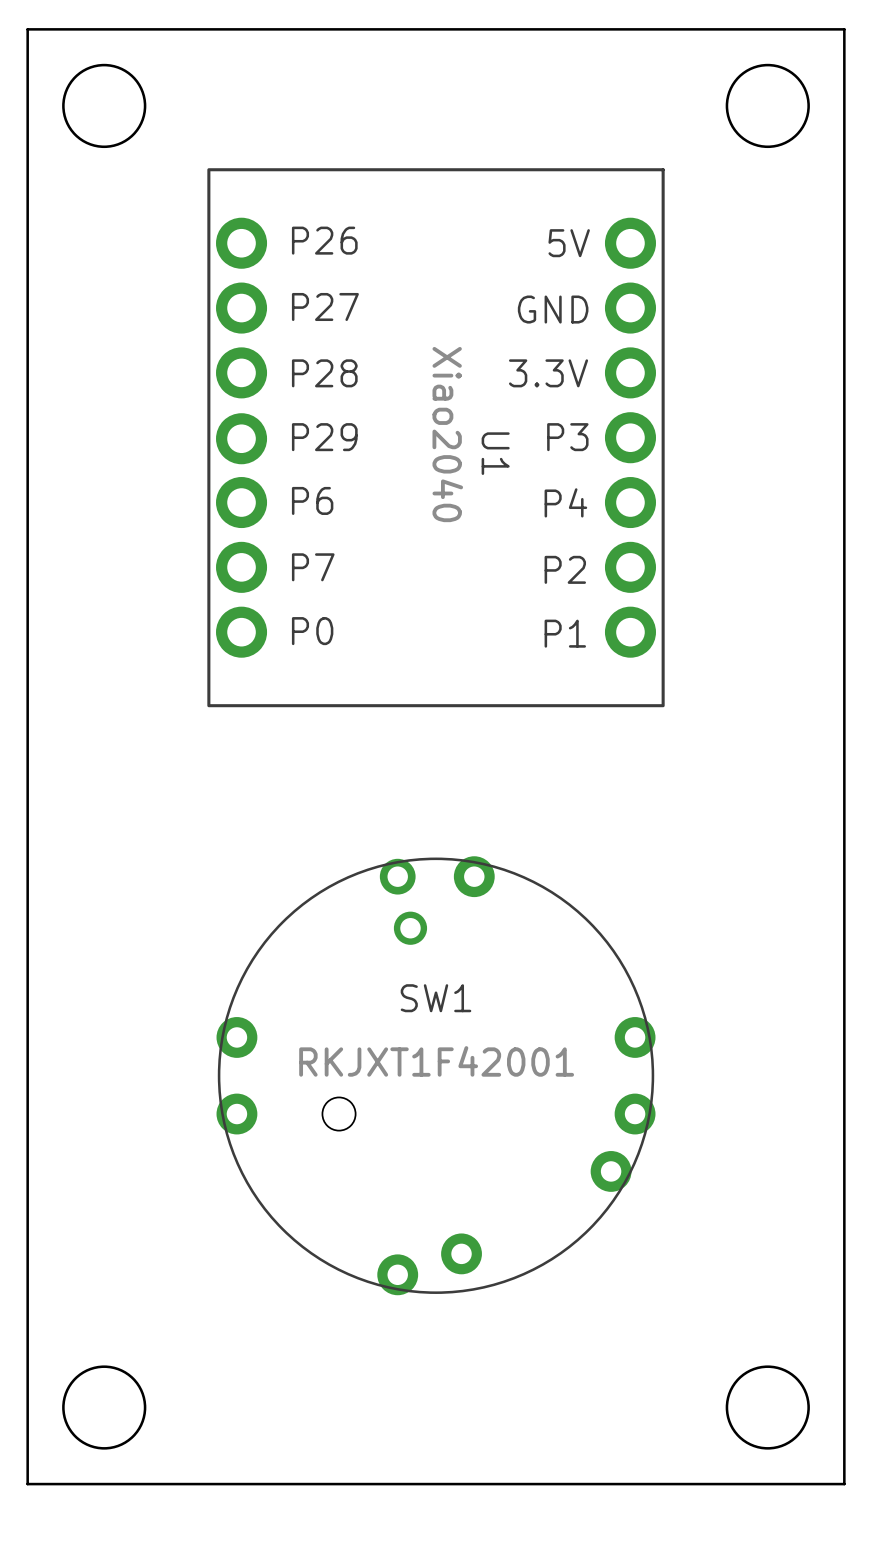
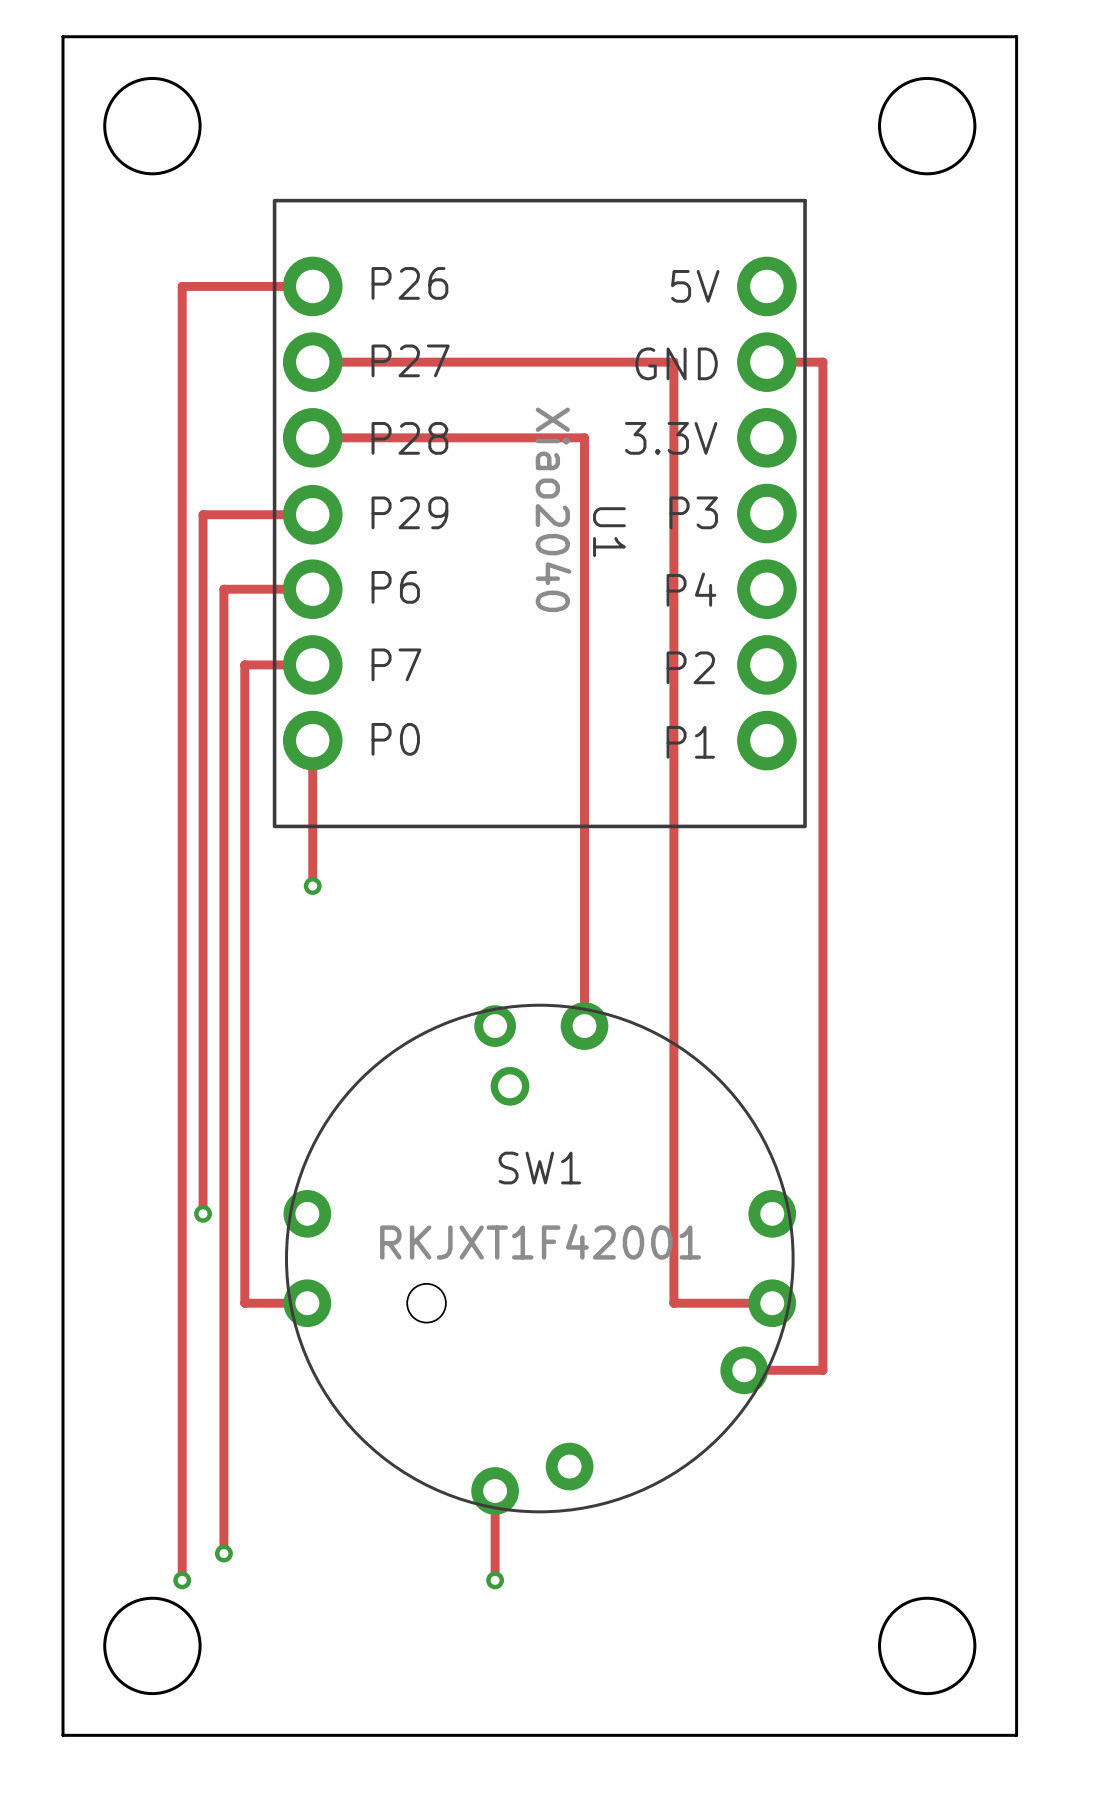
track: none -> (312, 286) (182, 286) (182, 1580)
track: none -> (312, 362) (673, 362) (673, 1303) (772, 1303)
track: none -> (766, 362) (822, 362) (822, 1370) (744, 1370)
track: none -> (312, 437) (584, 437) (584, 1026)
track: none -> (312, 514) (203, 514) (203, 1213)
track: none -> (312, 589) (223, 589) (223, 1553)
track: none -> (312, 664) (244, 664) (244, 1303) (307, 1303)
track: none -> (312, 740) (312, 886)
via: none -> (312, 886)
via: none -> (203, 1213)
track: none -> (495, 1490) (495, 1580)
via: none -> (223, 1553)
via: none -> (182, 1580)
via: none -> (495, 1580)

